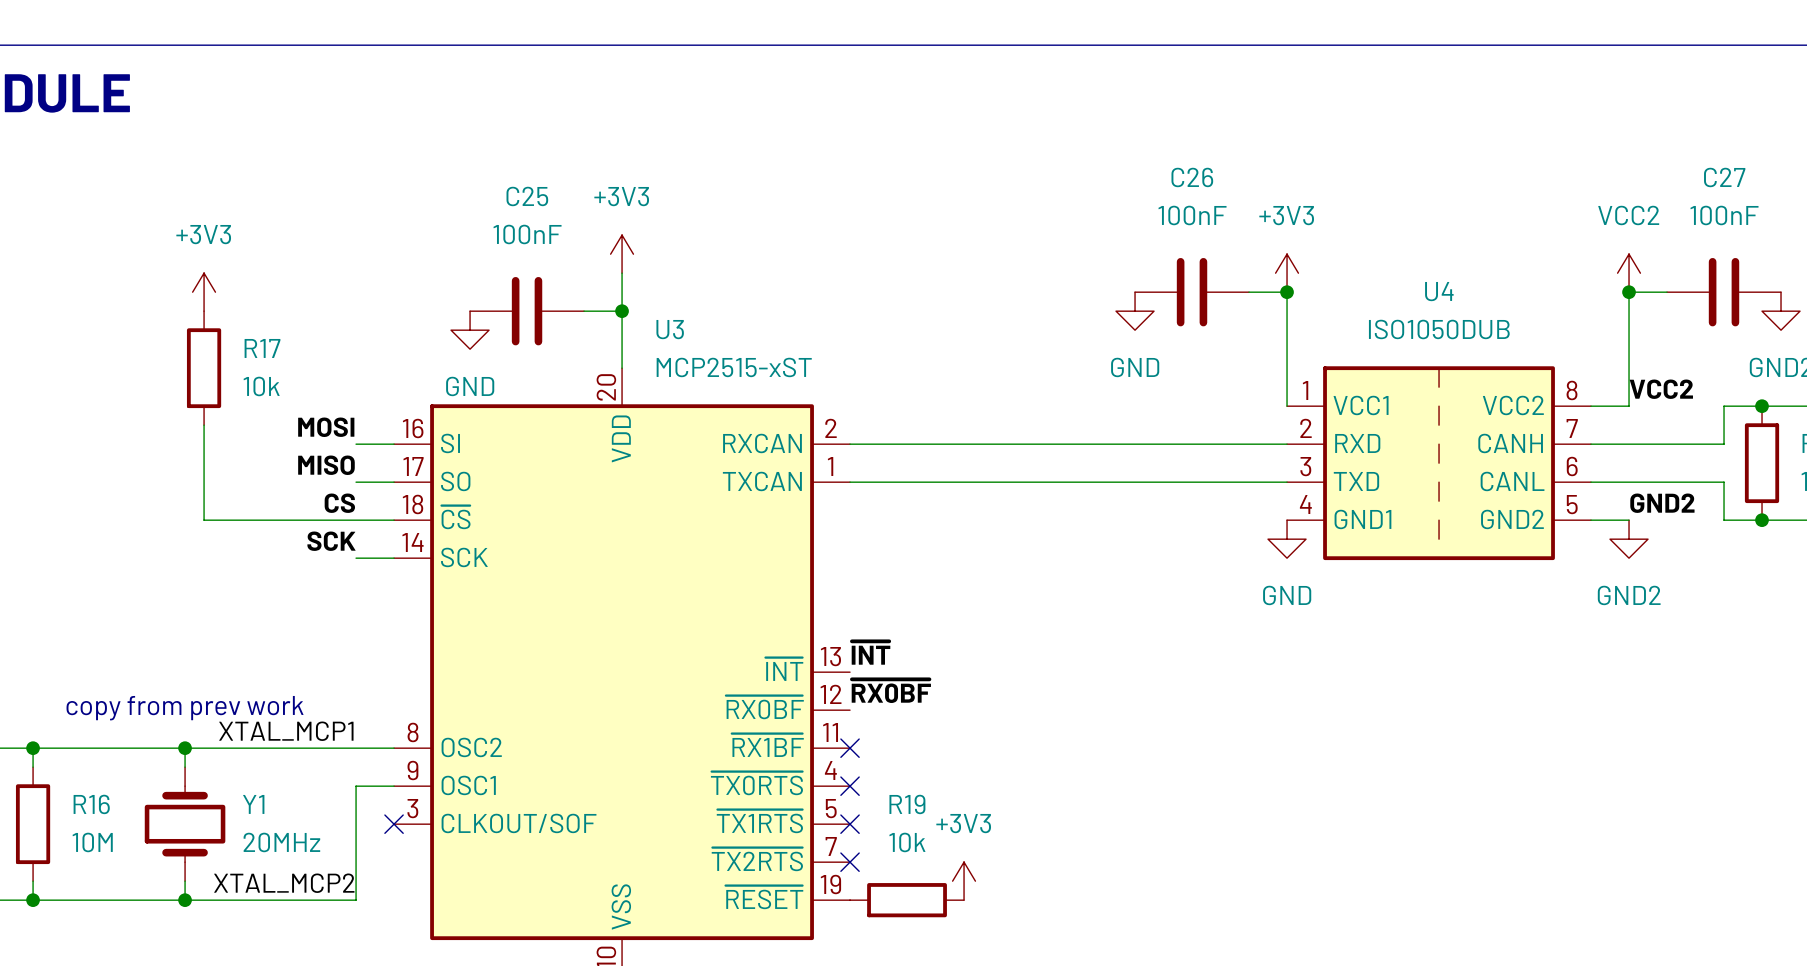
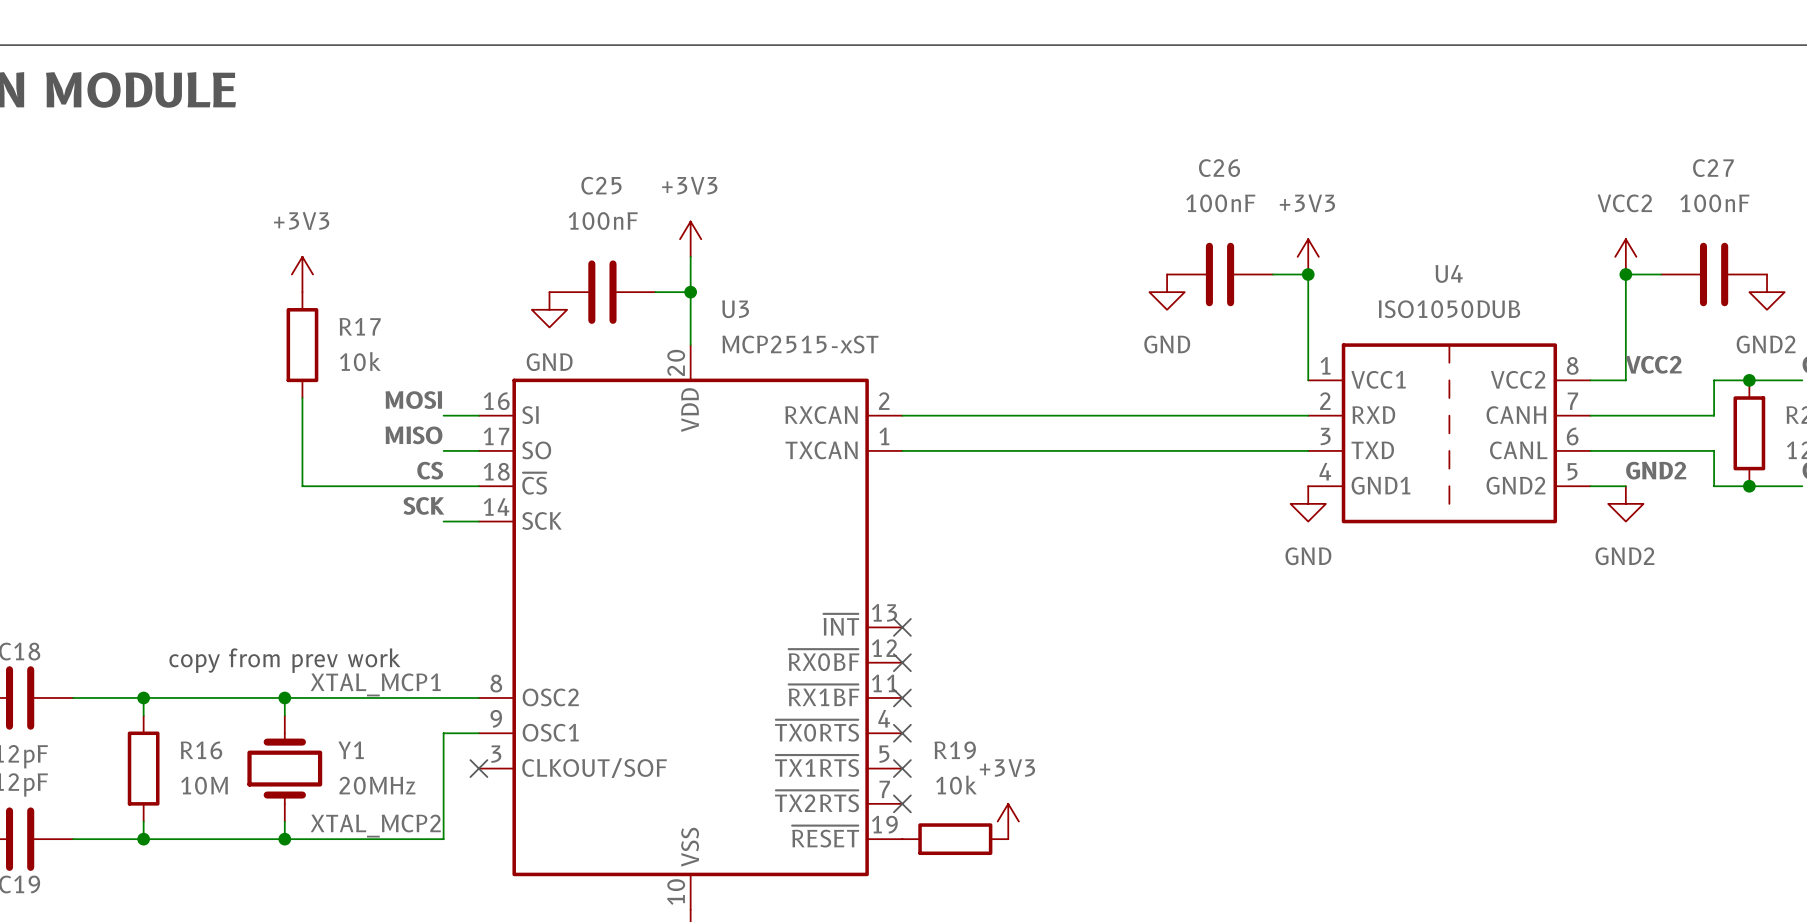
label: ~{INT} (871, 653) -> none
no-connect mark: none -> (902, 627)
label: ~{RX0BF} (891, 691) -> none
no-connect mark: none -> (902, 662)

